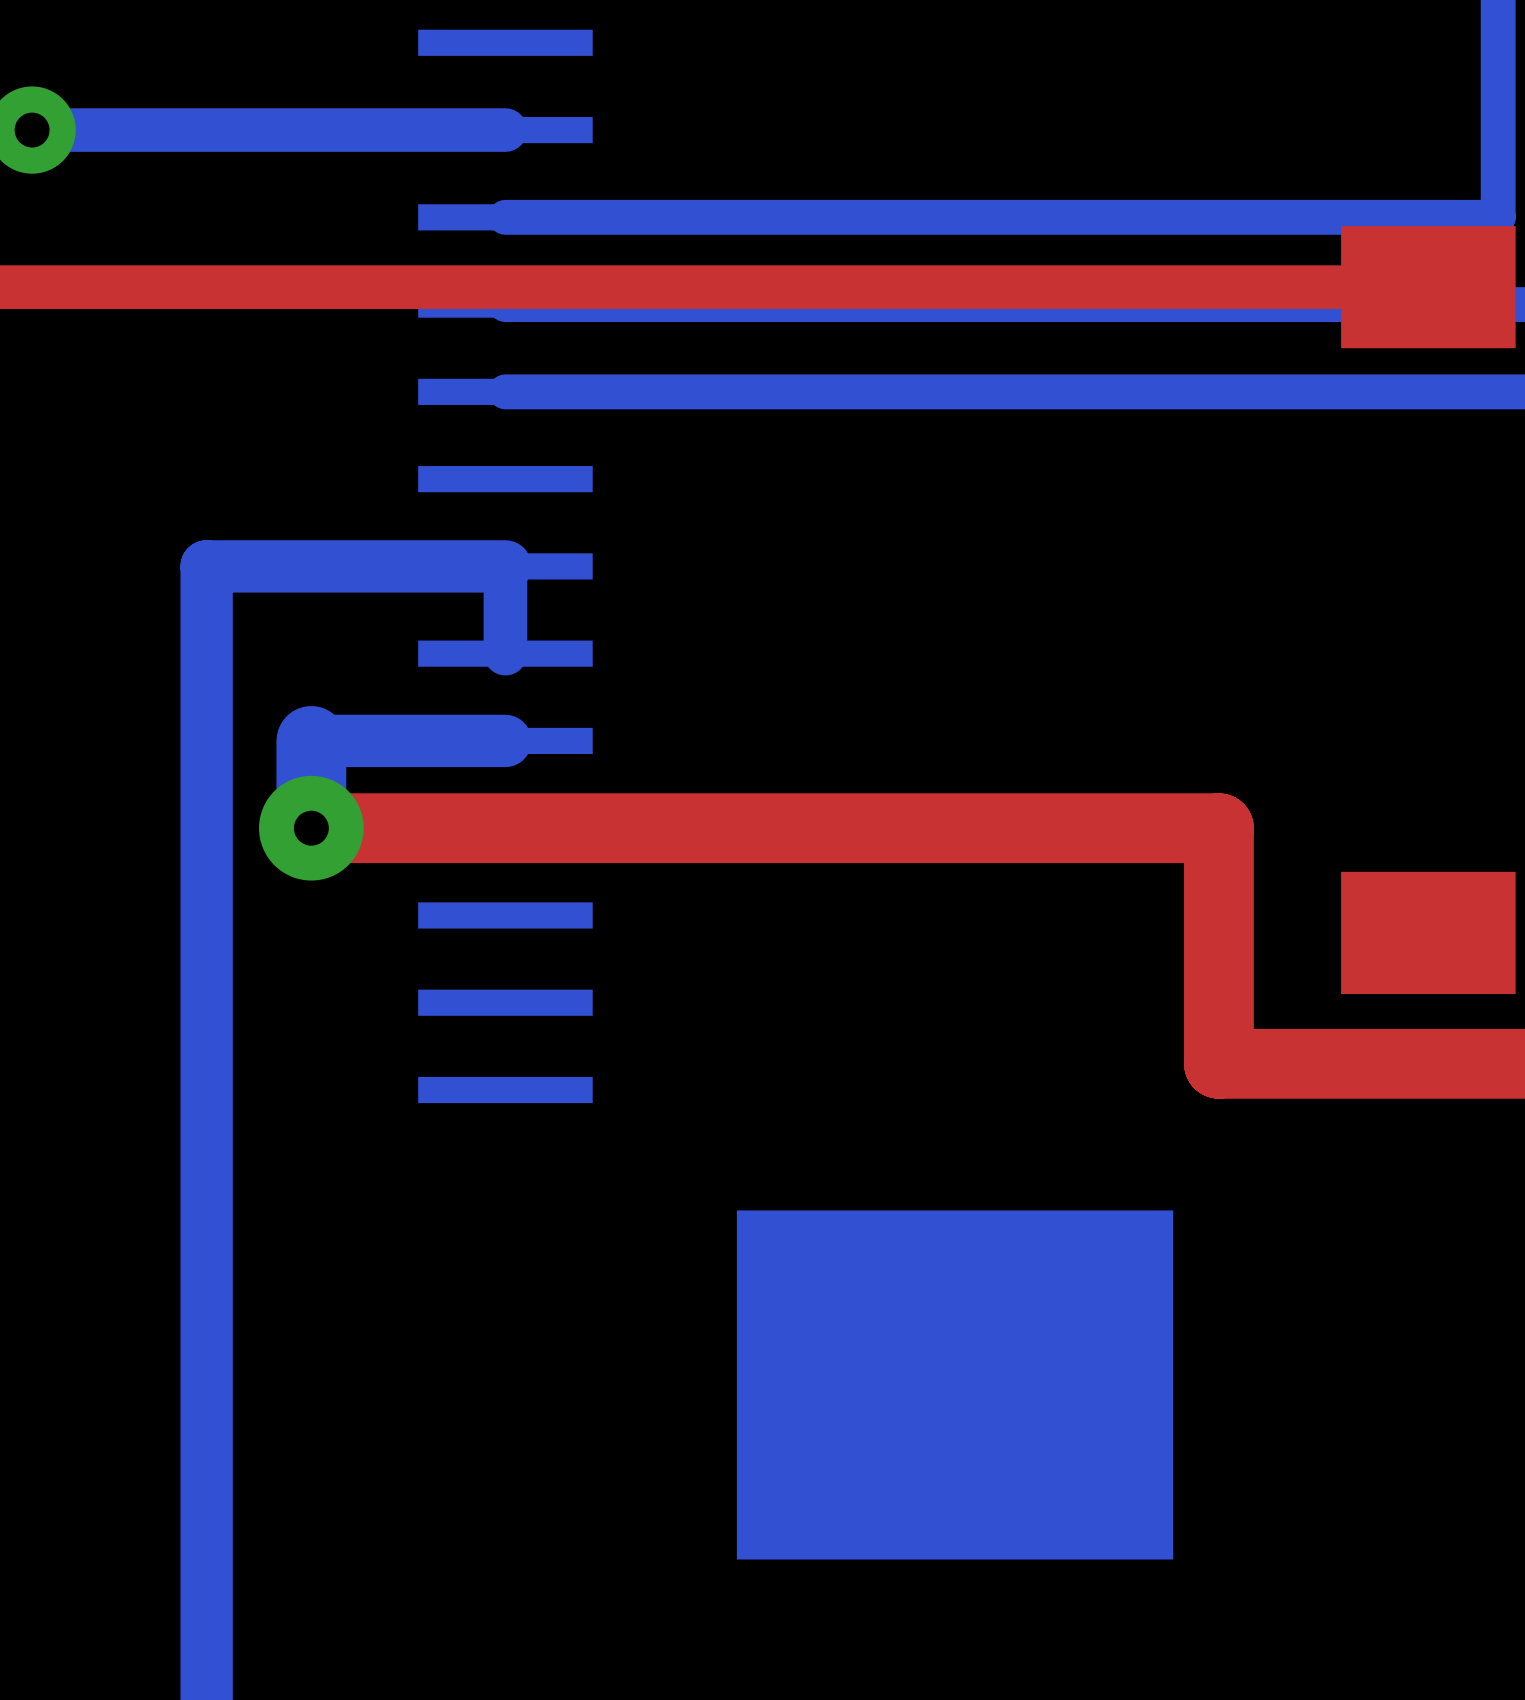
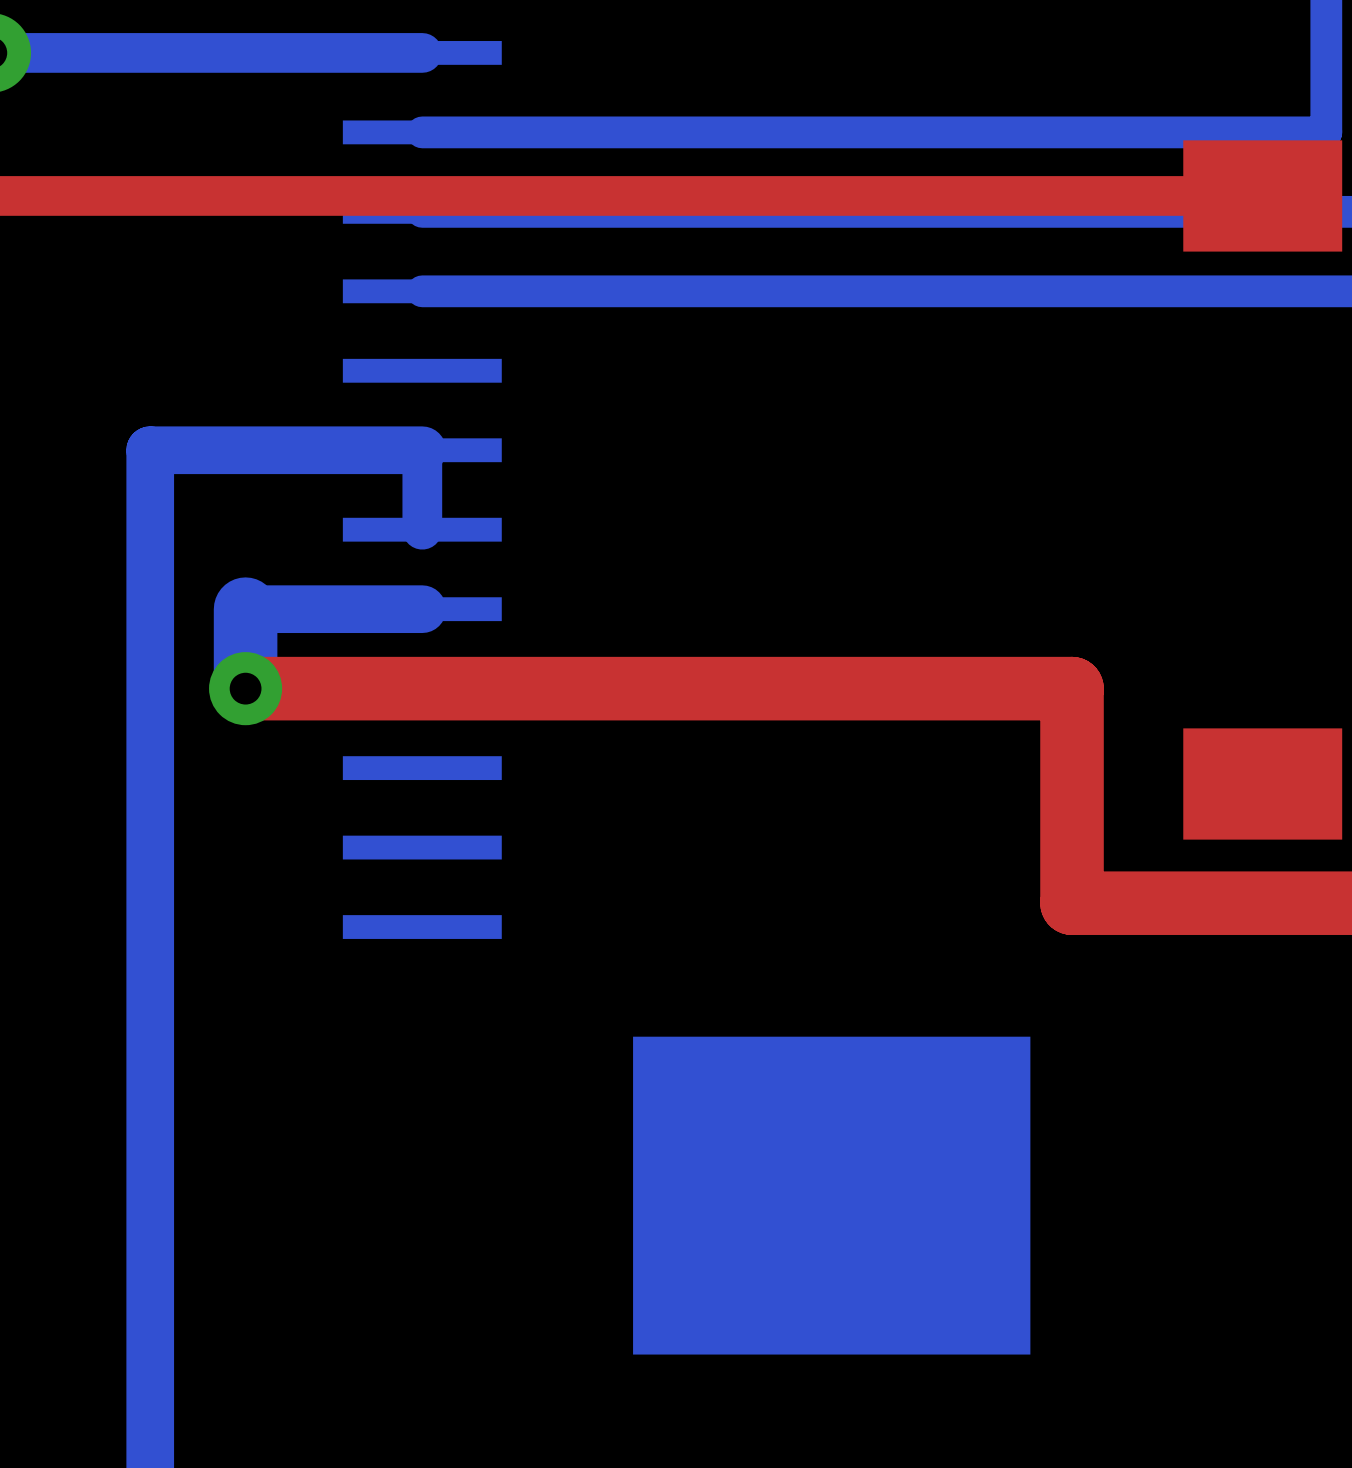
via size: [259, 775, 364, 881] -> [209, 652, 283, 726]

